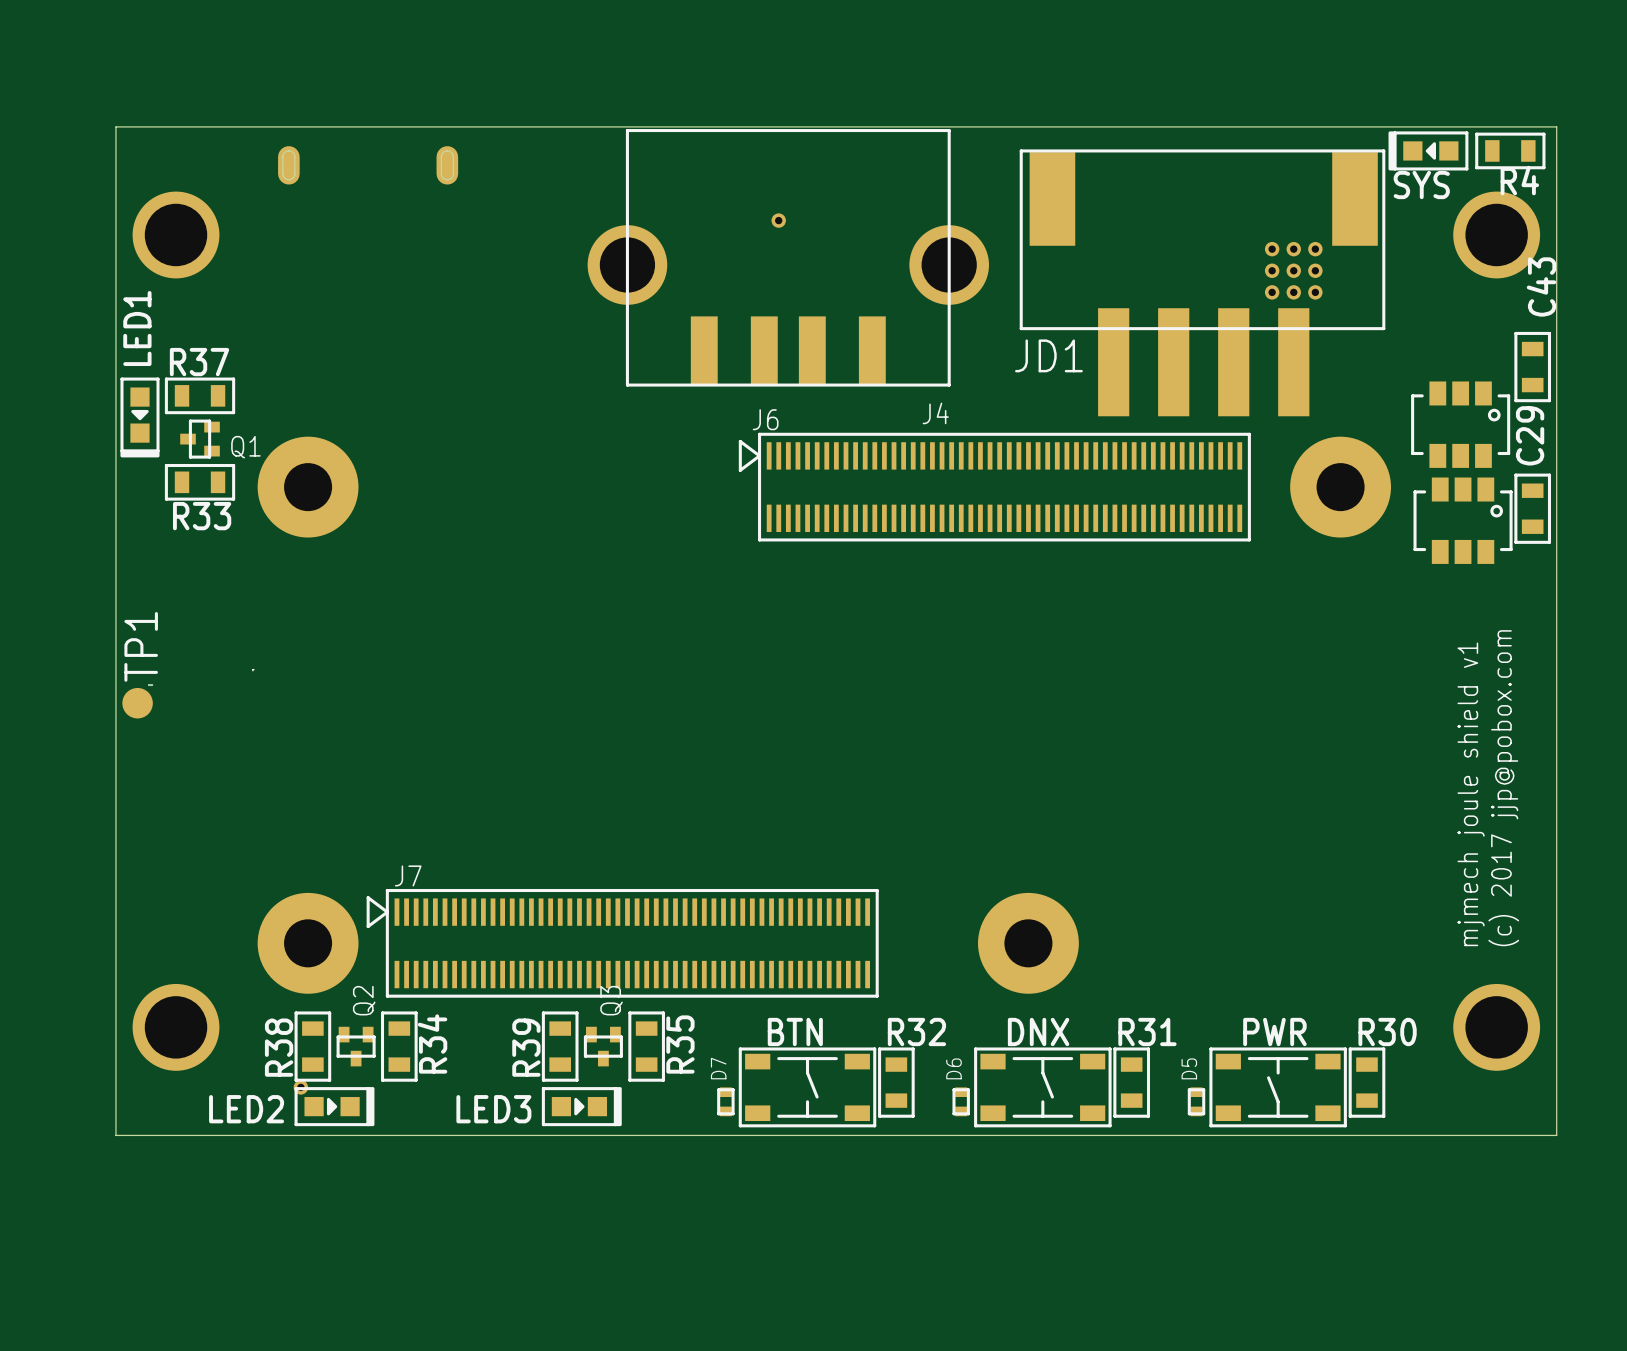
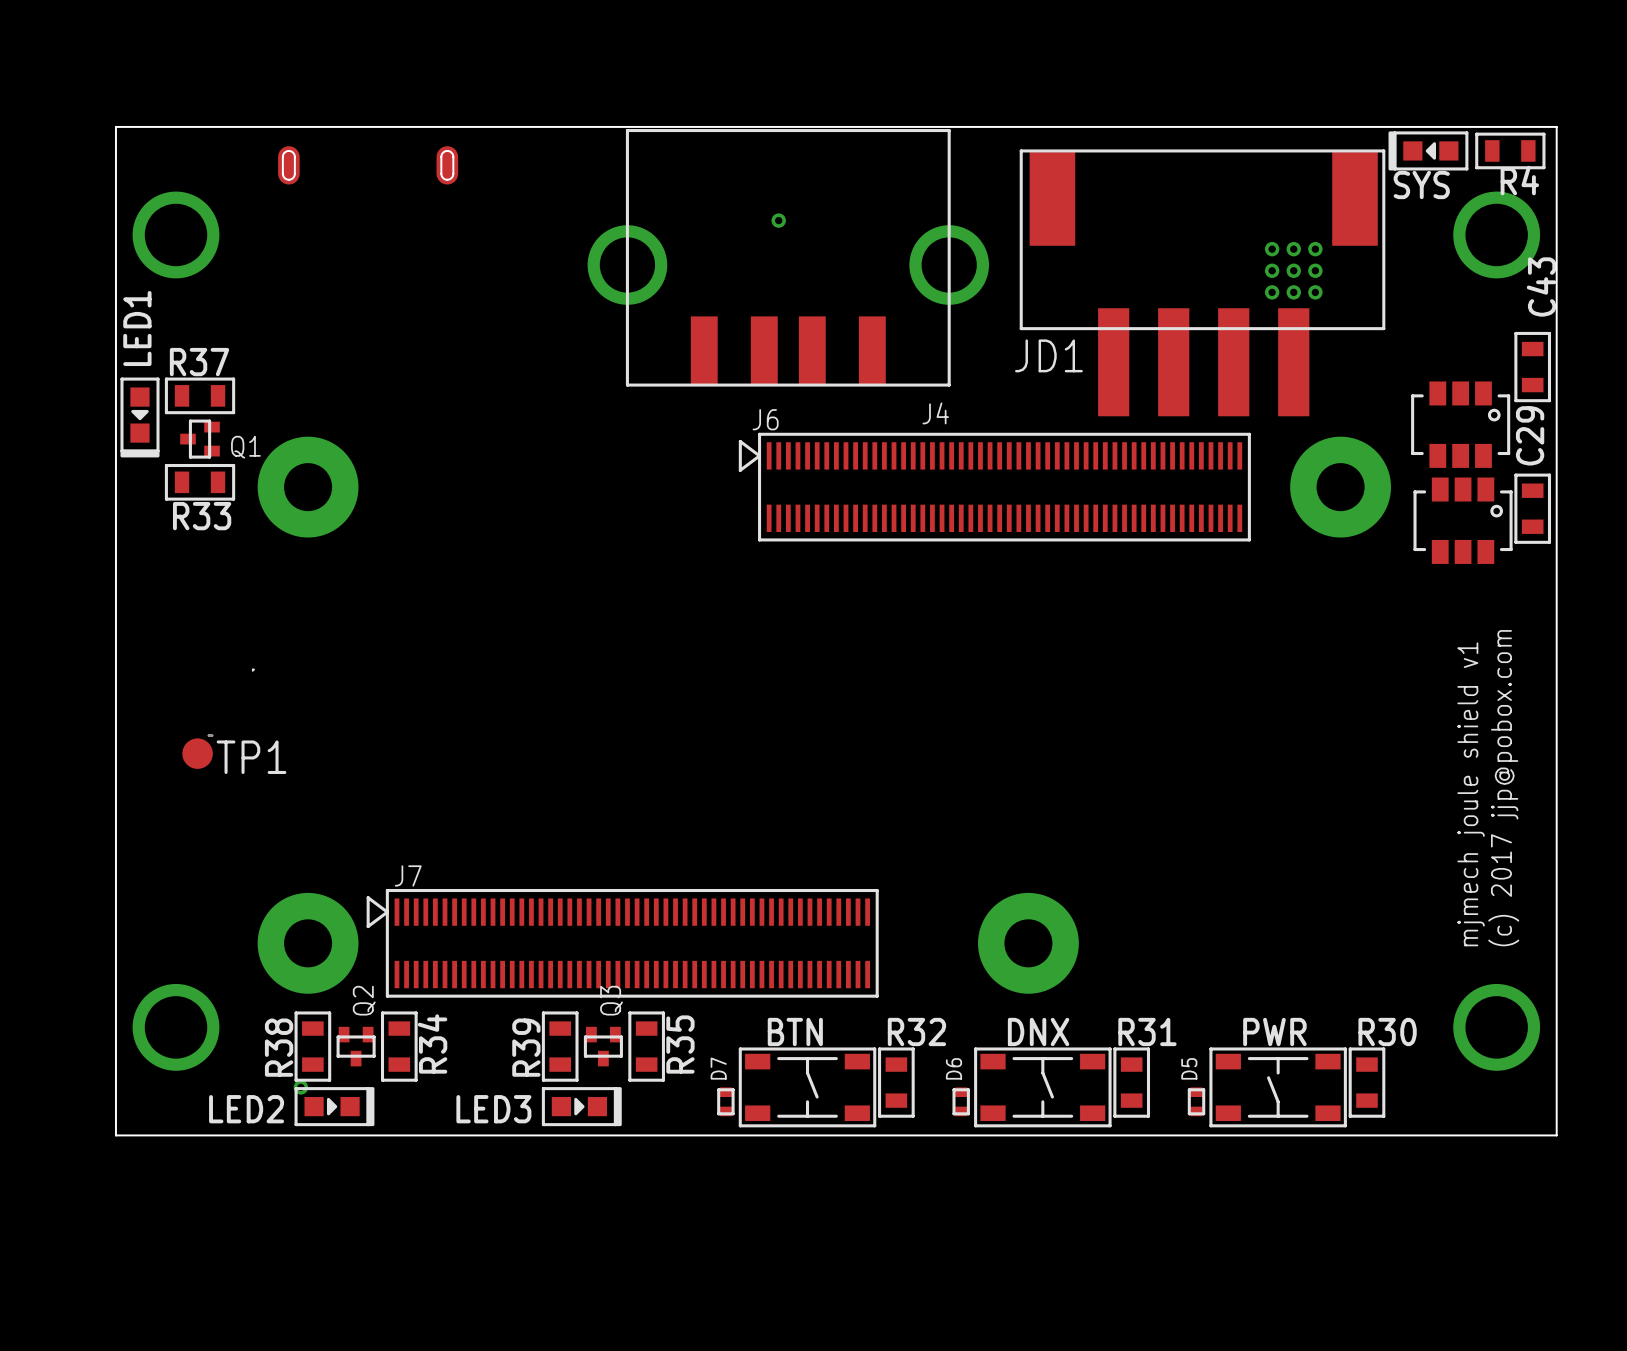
TP1 name rotation: 0° (141, 646) -> 90° clockwise (251, 757)
TP1 position: (137, 703) -> (197, 753)

